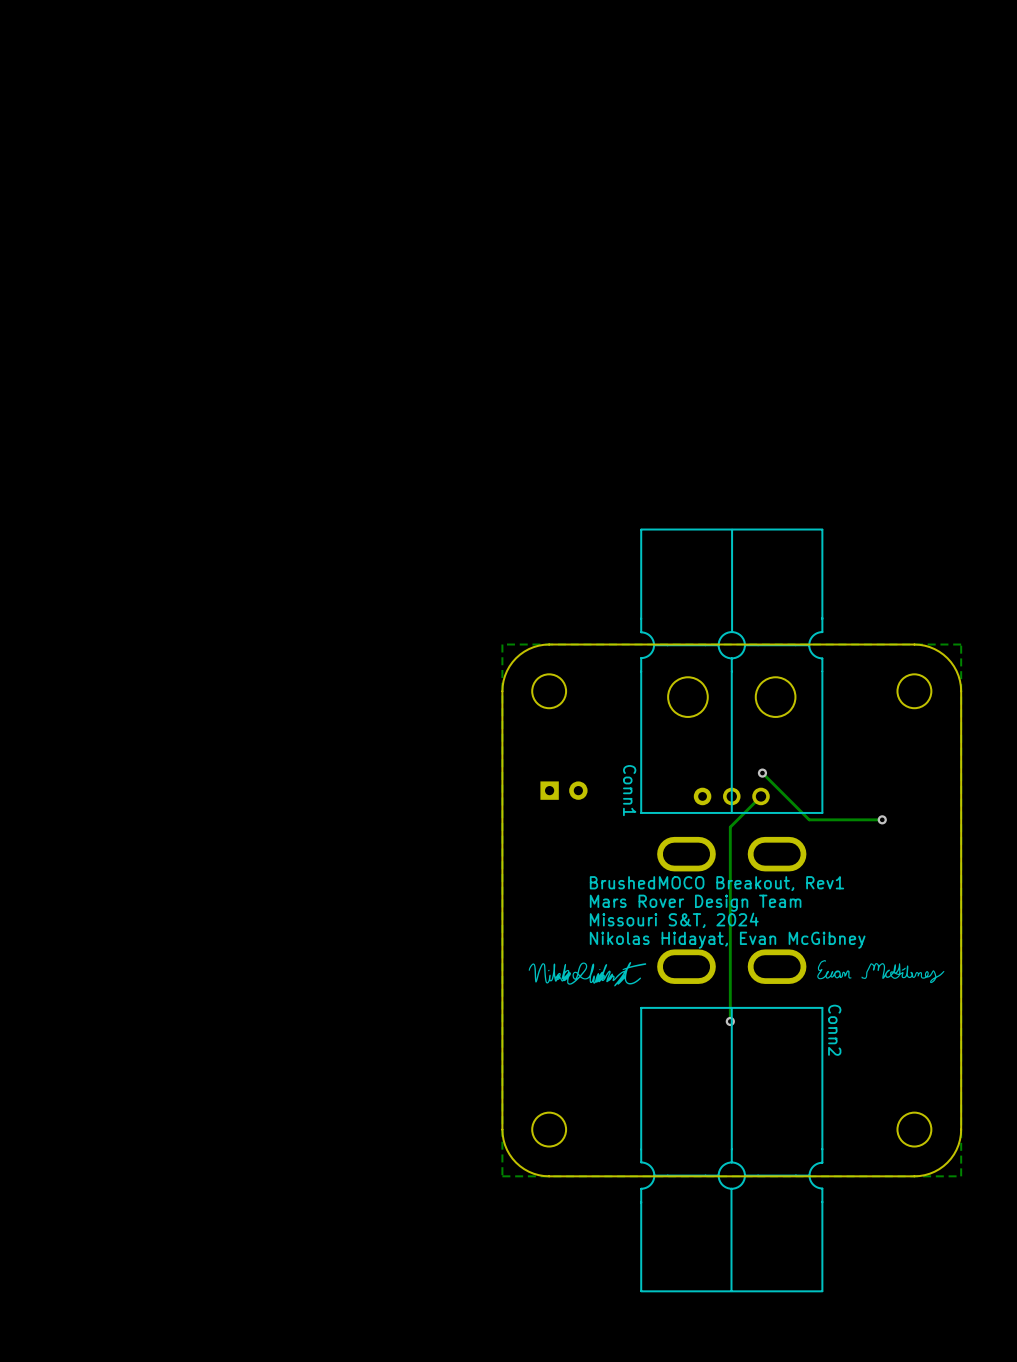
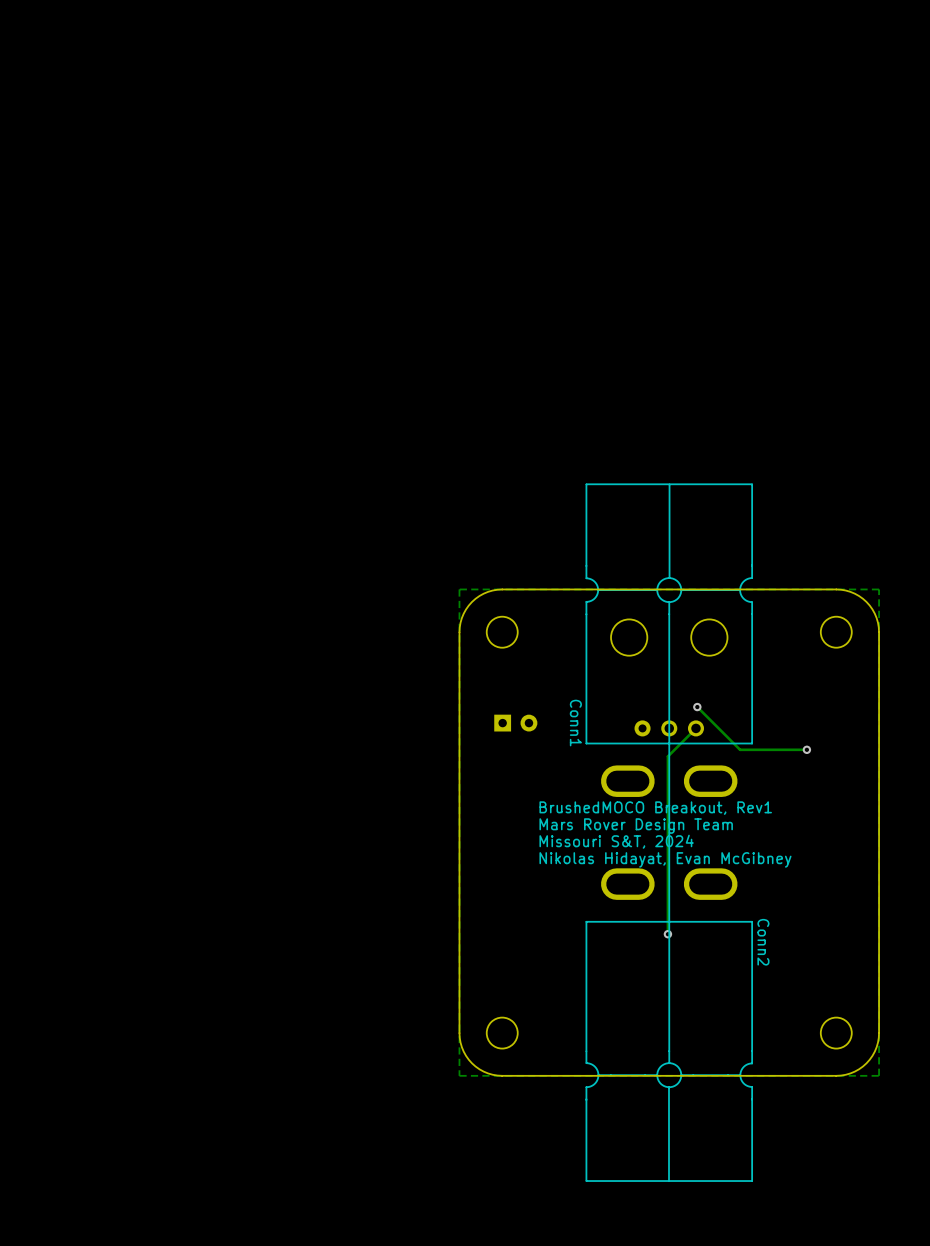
line: none -> (669, 743) (669, 921)
drawing: [817, 960, 945, 984] -> none
drawing: [528, 962, 647, 987] -> none

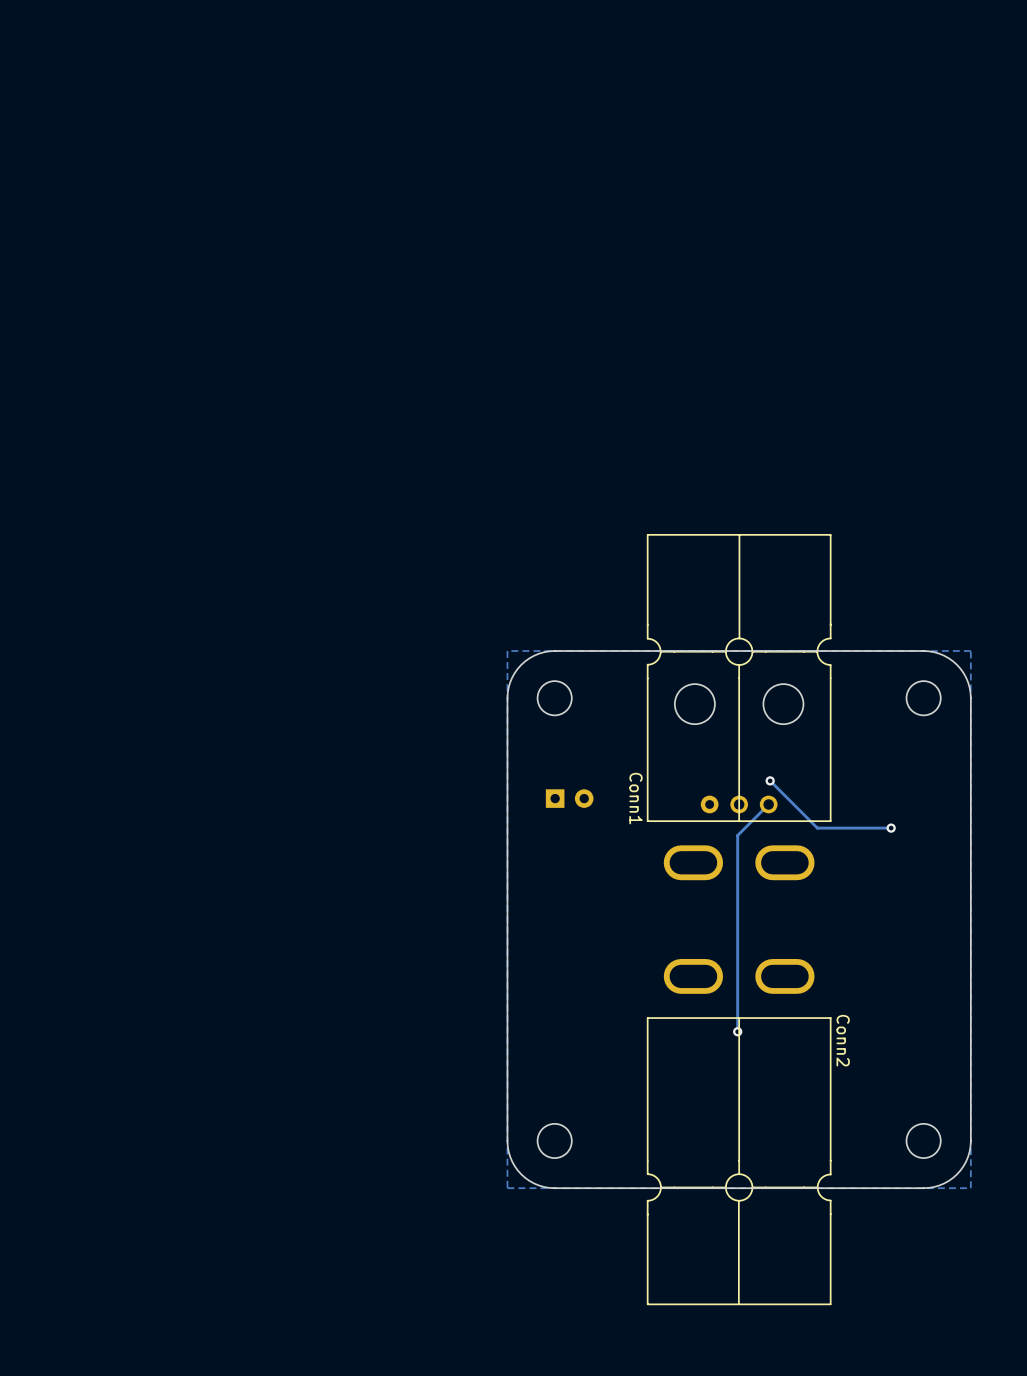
line: (669, 743) (669, 921) -> none
text: BrushedMOCO Breakout, Rev1 (655, 808) -> none
text: Mars Rover Design Team (636, 826) -> none
text: Missouri S&T, 2024 (616, 841) -> none
text: Nikolas Hidayat, Evan McGibney (665, 859) -> none

